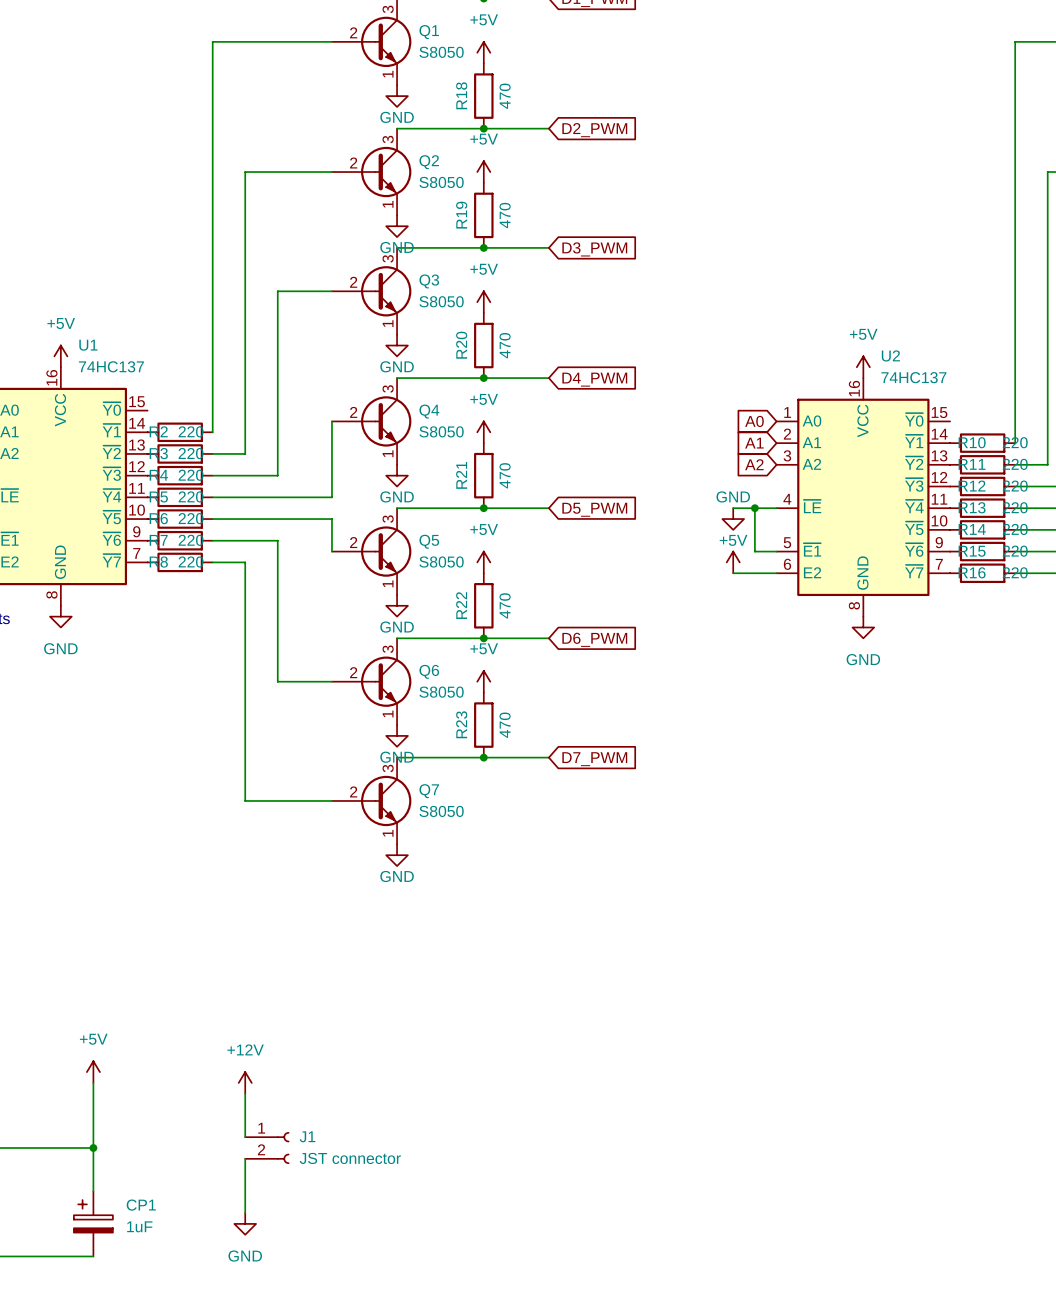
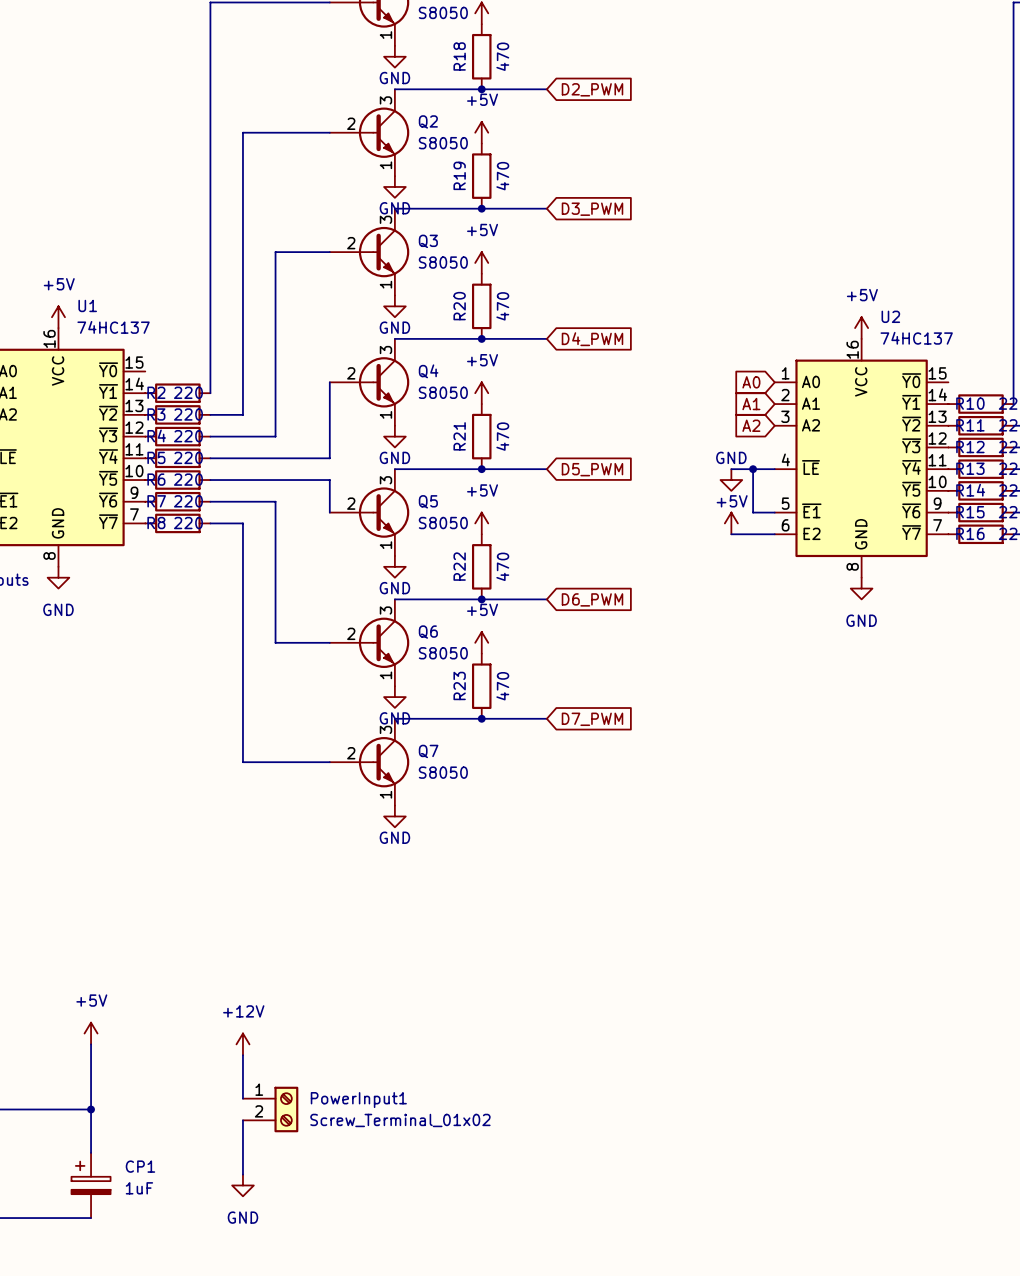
J1: JST connector (267, 1148) -> none
PowerInput1: none -> Screw_Terminal_01x02 (270, 1109)

